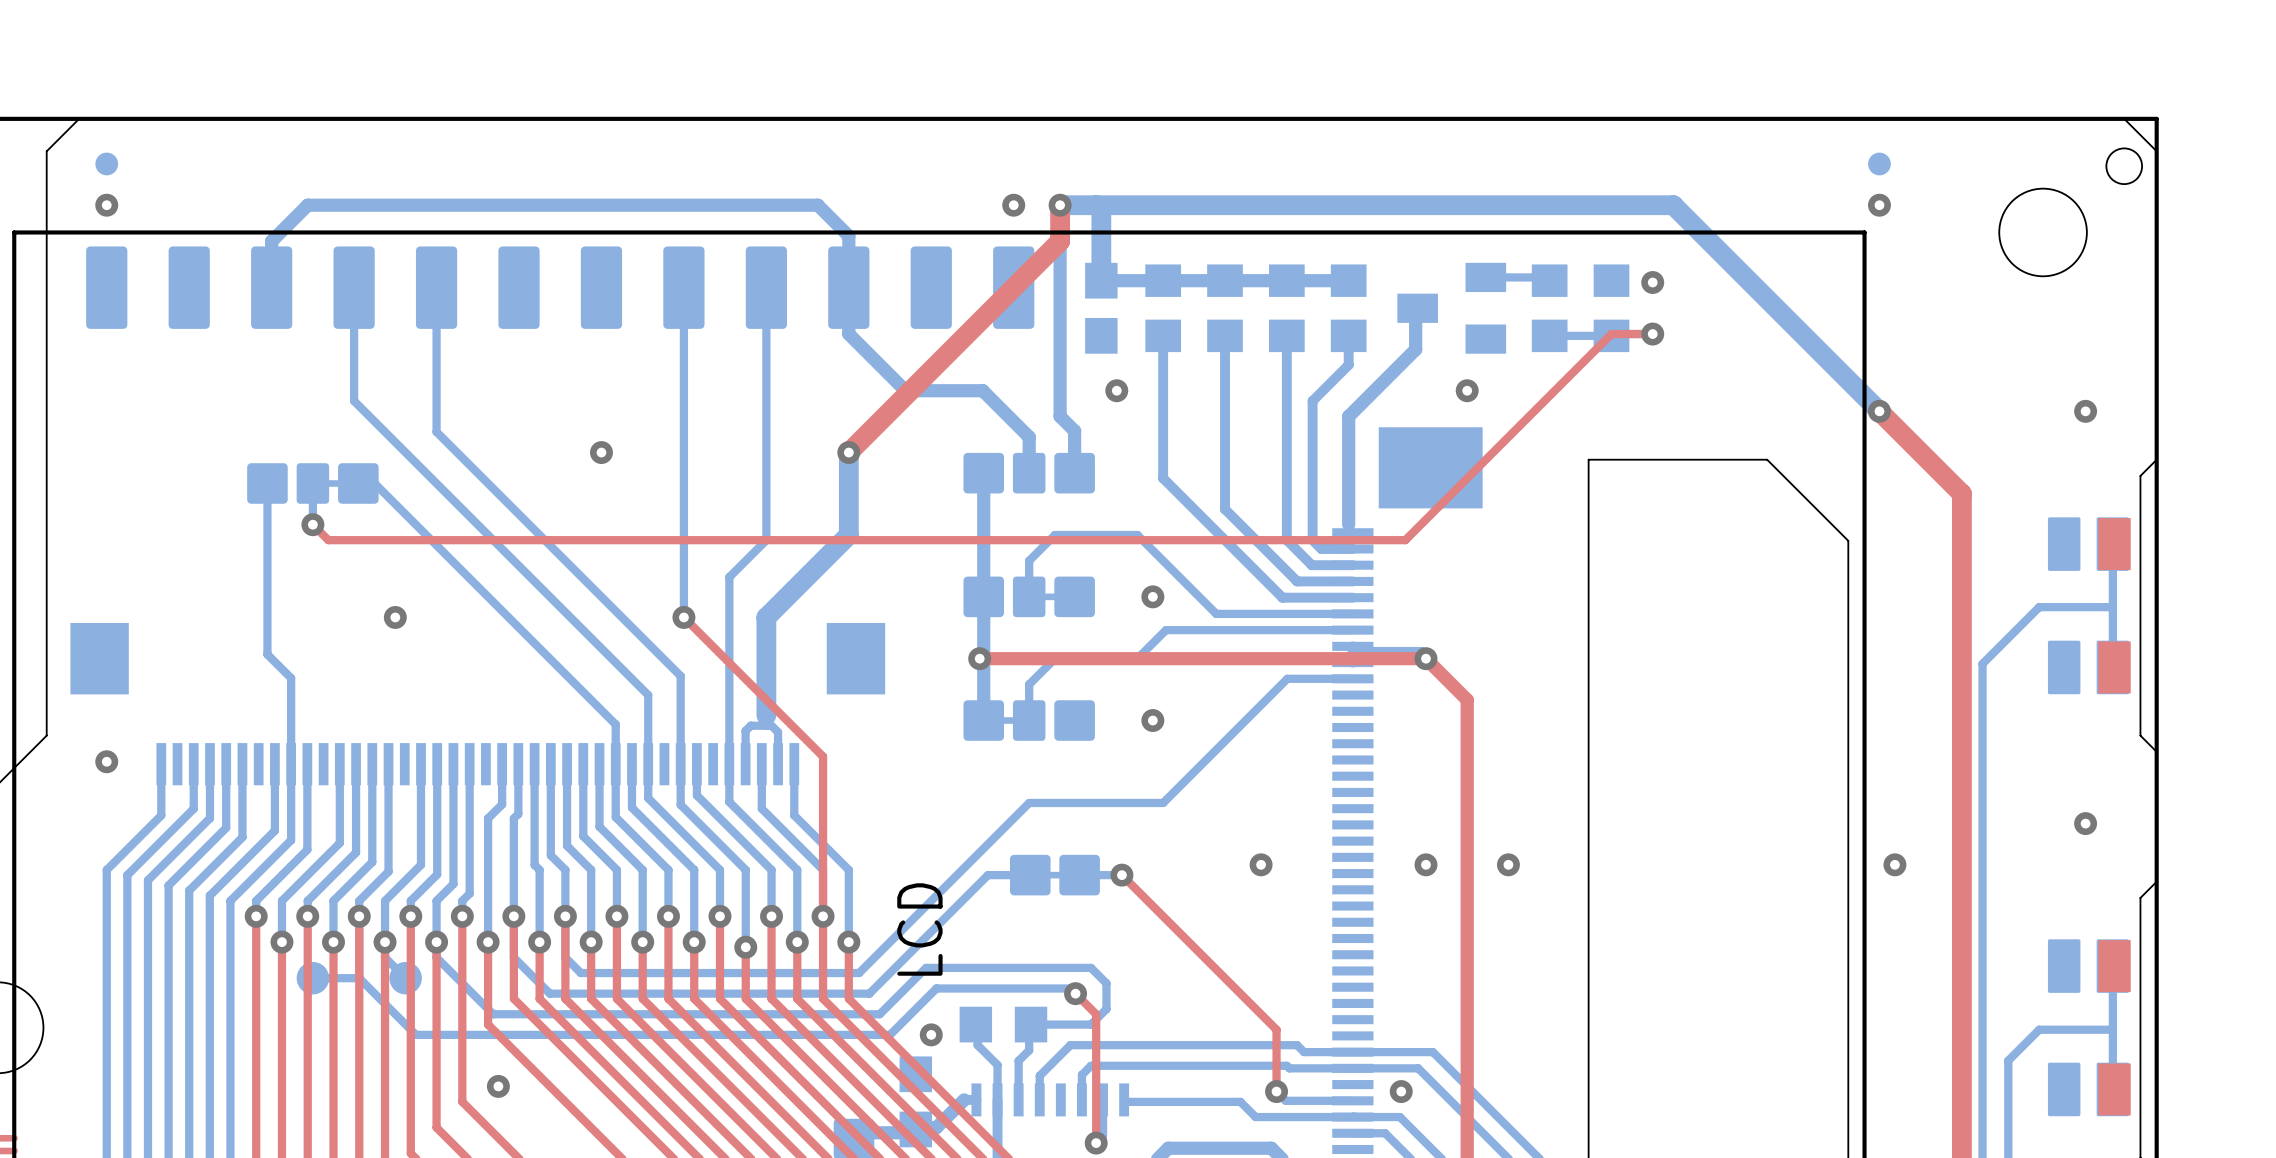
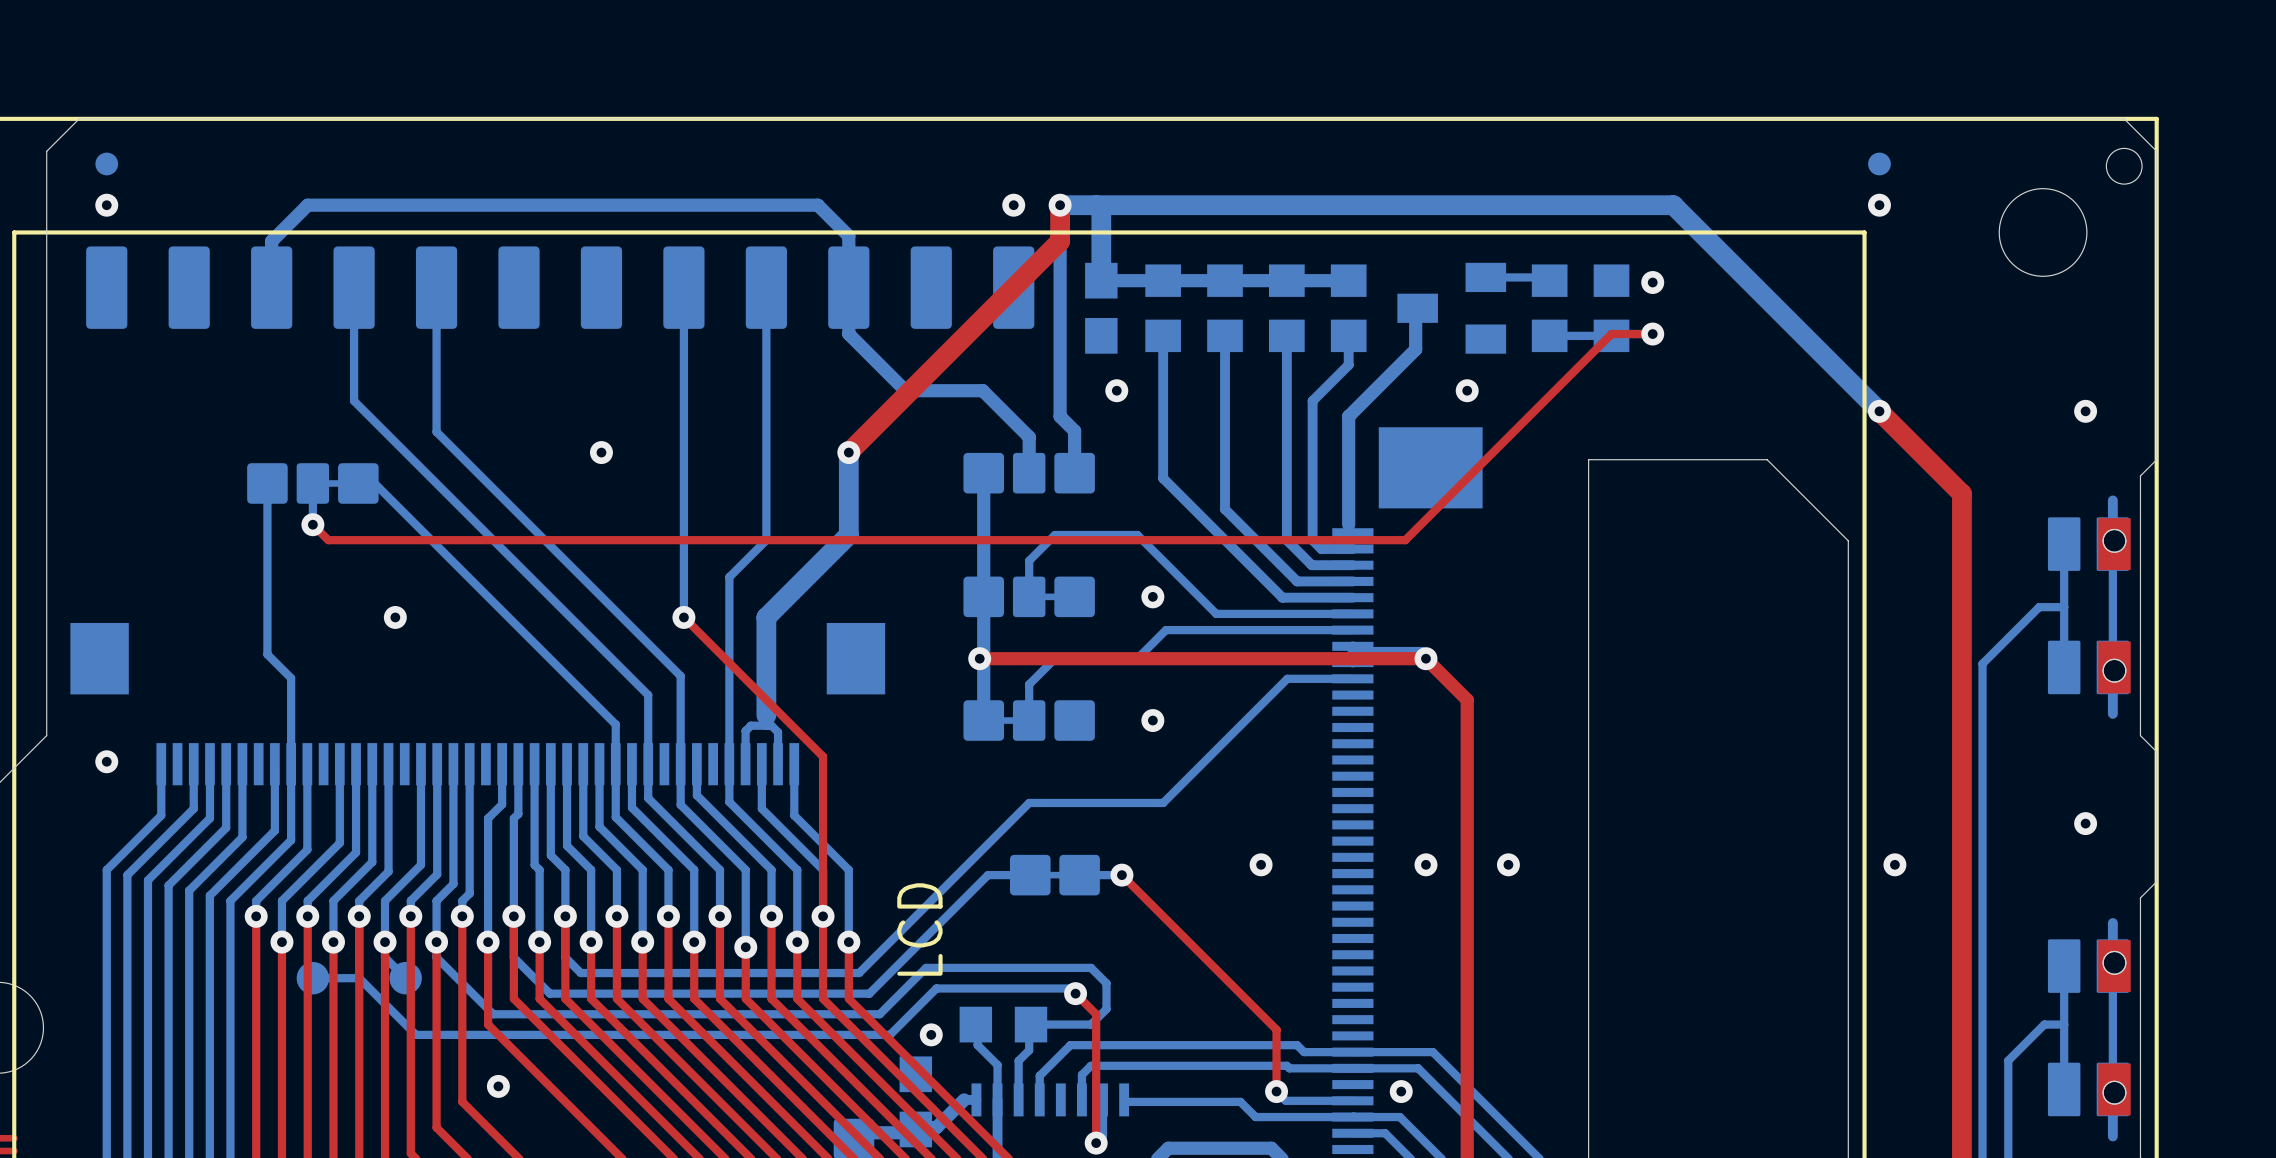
bottom track: none -> (2112, 500) (2112, 544)
part footprint: [2047, 517, 2131, 695] -> [2047, 517, 2131, 695]
bottom track: none -> (2064, 544) (2064, 667)
bottom track: (2064, 607) (2112, 607) -> none
bottom track: none -> (2112, 667) (2112, 713)
bottom track: none -> (2112, 923) (2112, 966)
part footprint: [2047, 939, 2131, 1117] -> [2047, 939, 2131, 1117]
bottom track: none -> (2064, 966) (2064, 1089)
bottom track: (2039, 1029) (2112, 1029) -> (2039, 1029) (2044, 1024) (2064, 1024)
bottom track: none -> (2112, 1089) (2112, 1136)

